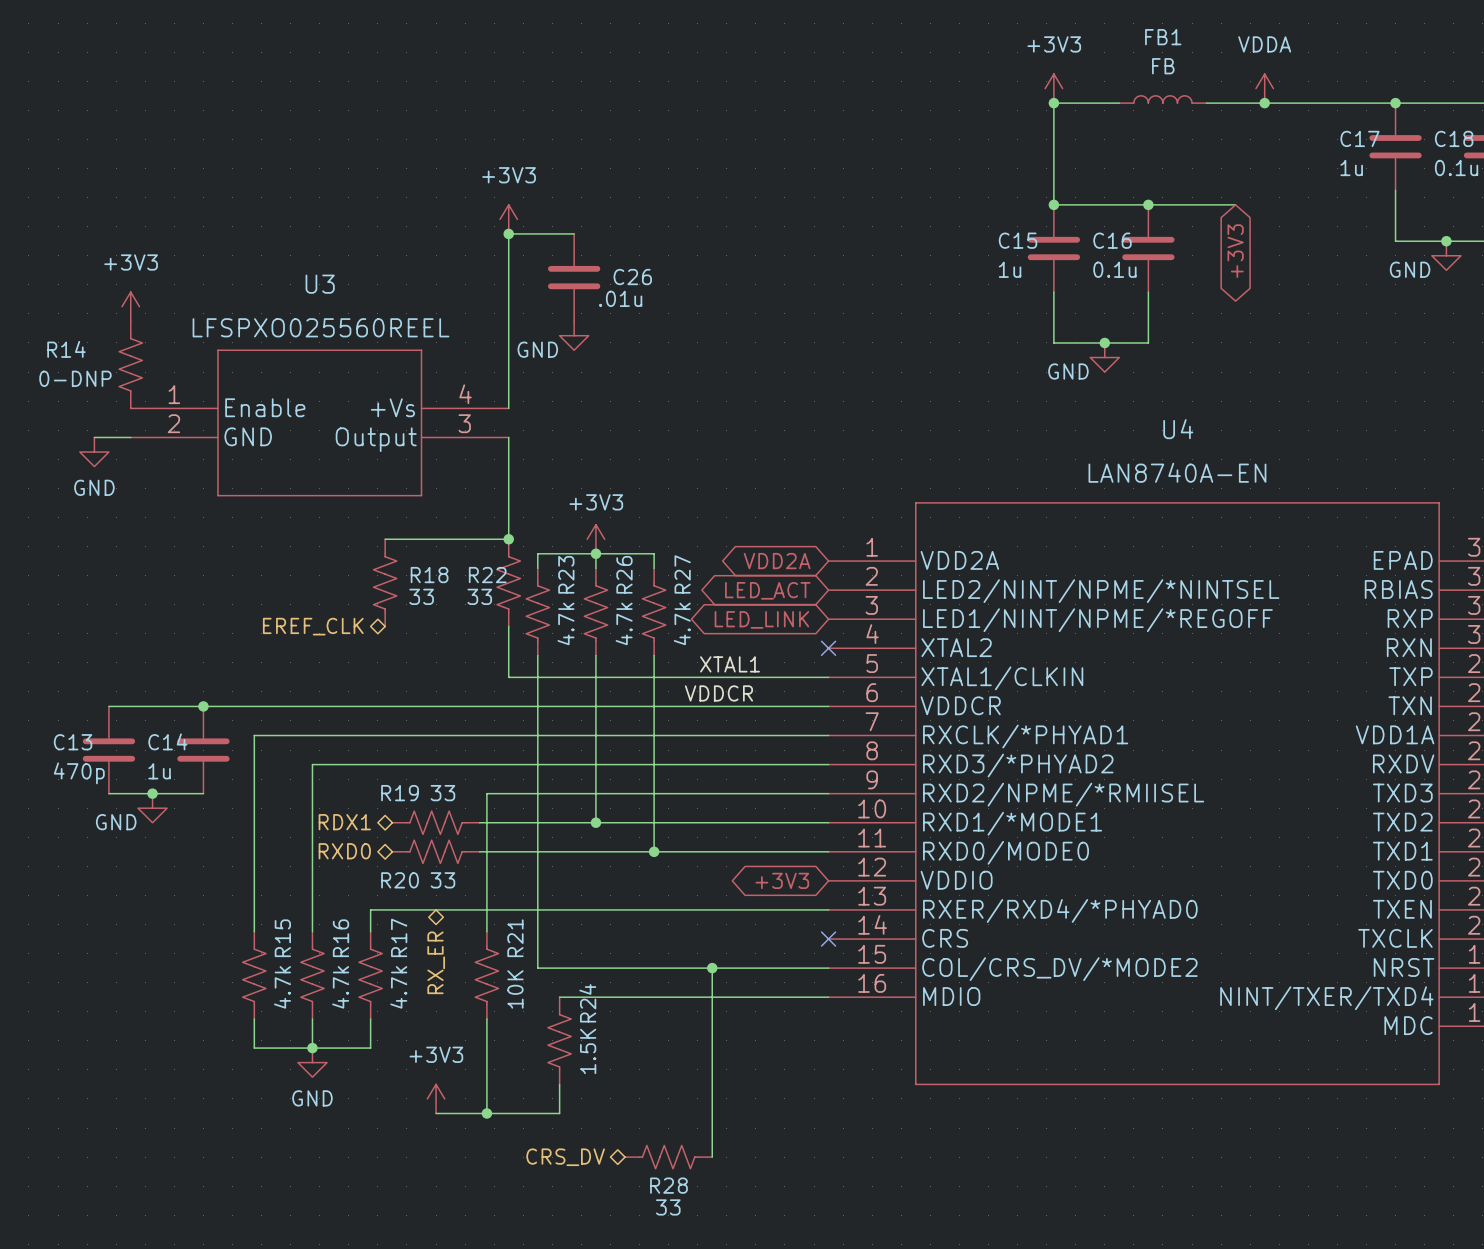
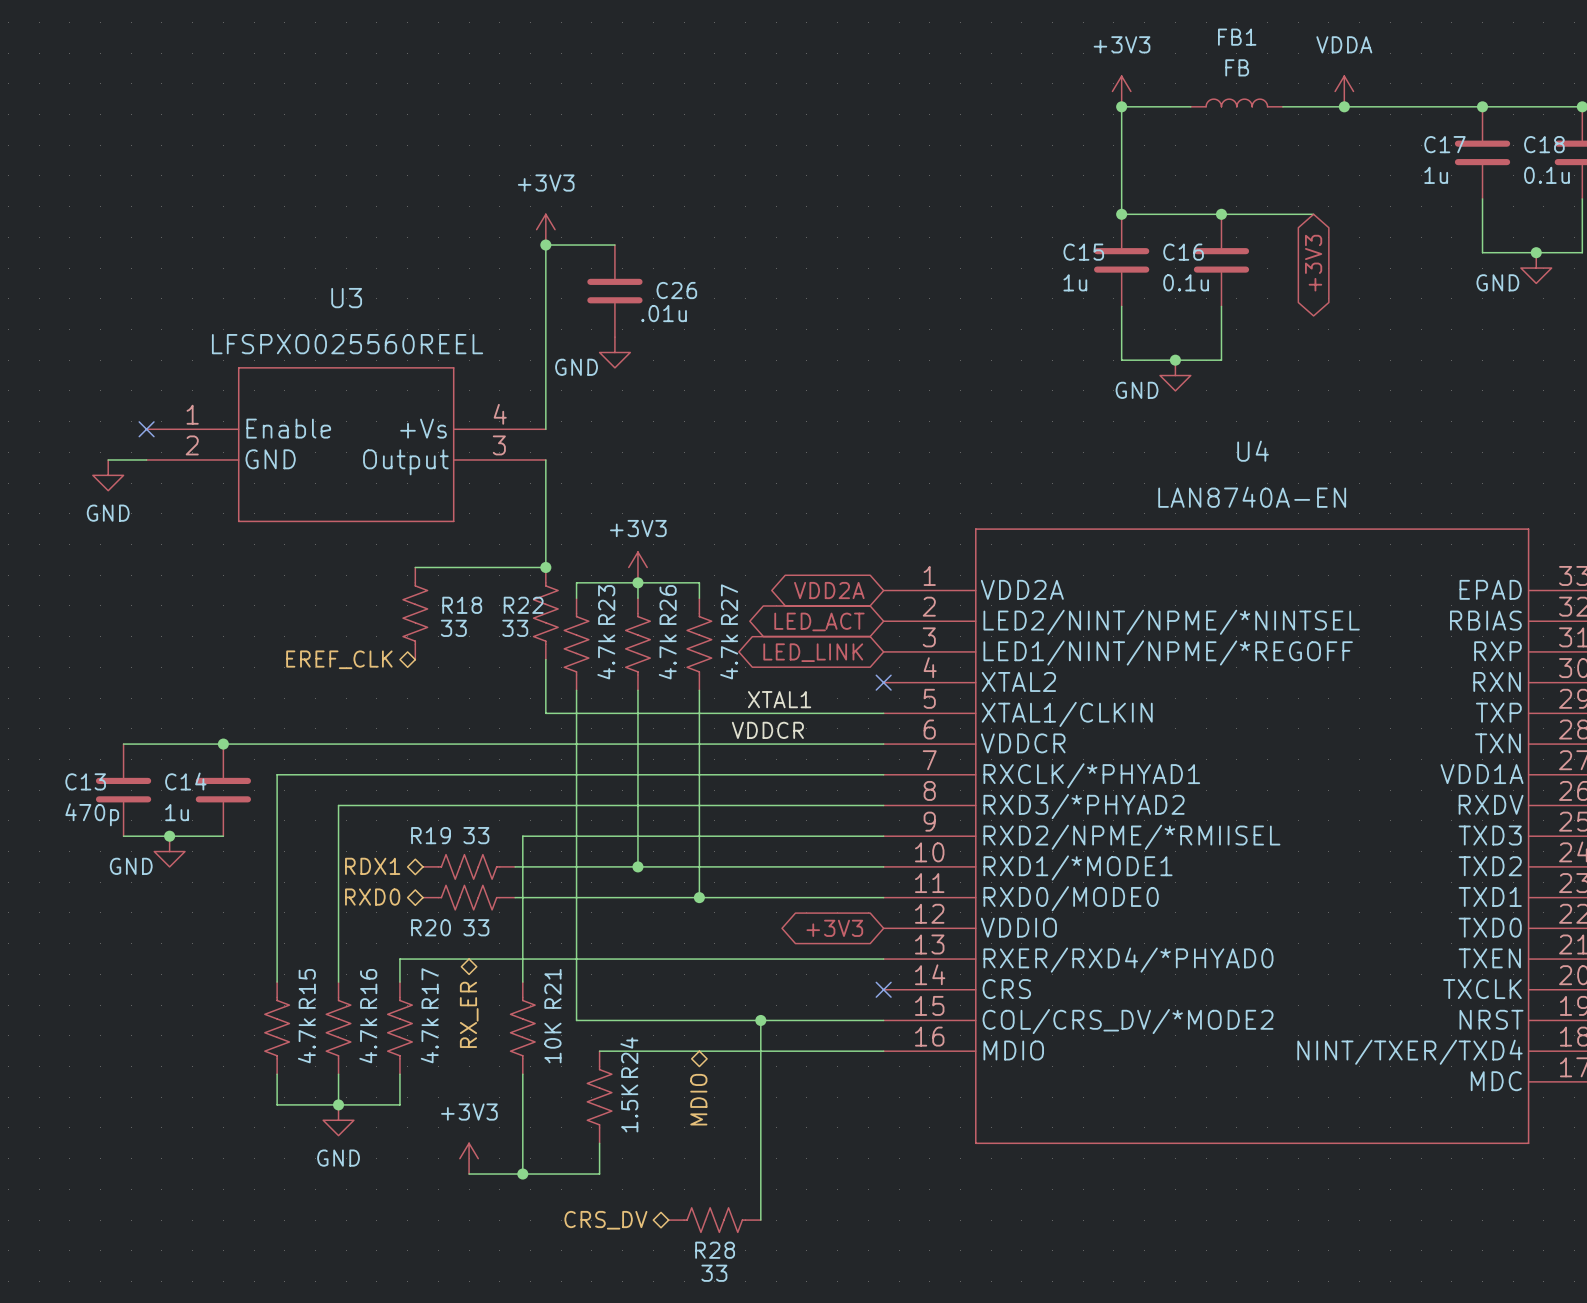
power symbol: +3V3 (130, 306) -> none
R14: 0-DNP (130, 364) -> none
no-connect mark: none -> (146, 429)
hierarchical label: none -> MDIO (698, 1099)

